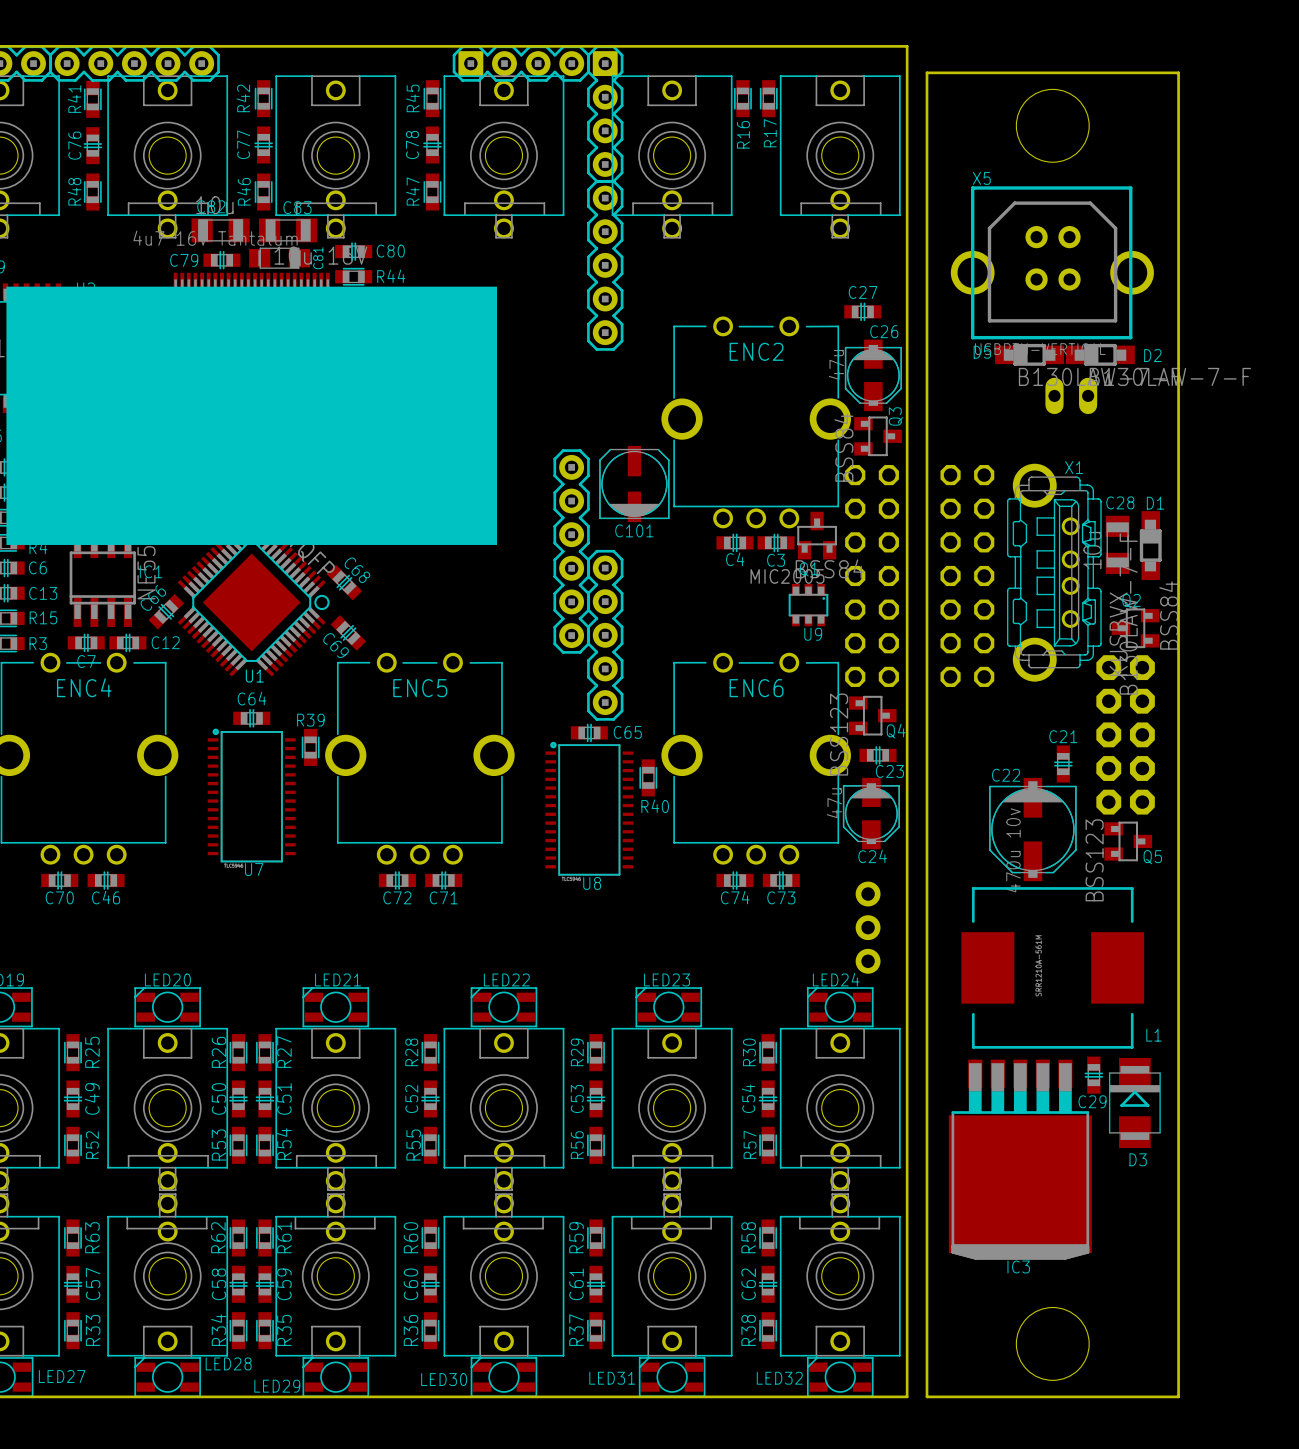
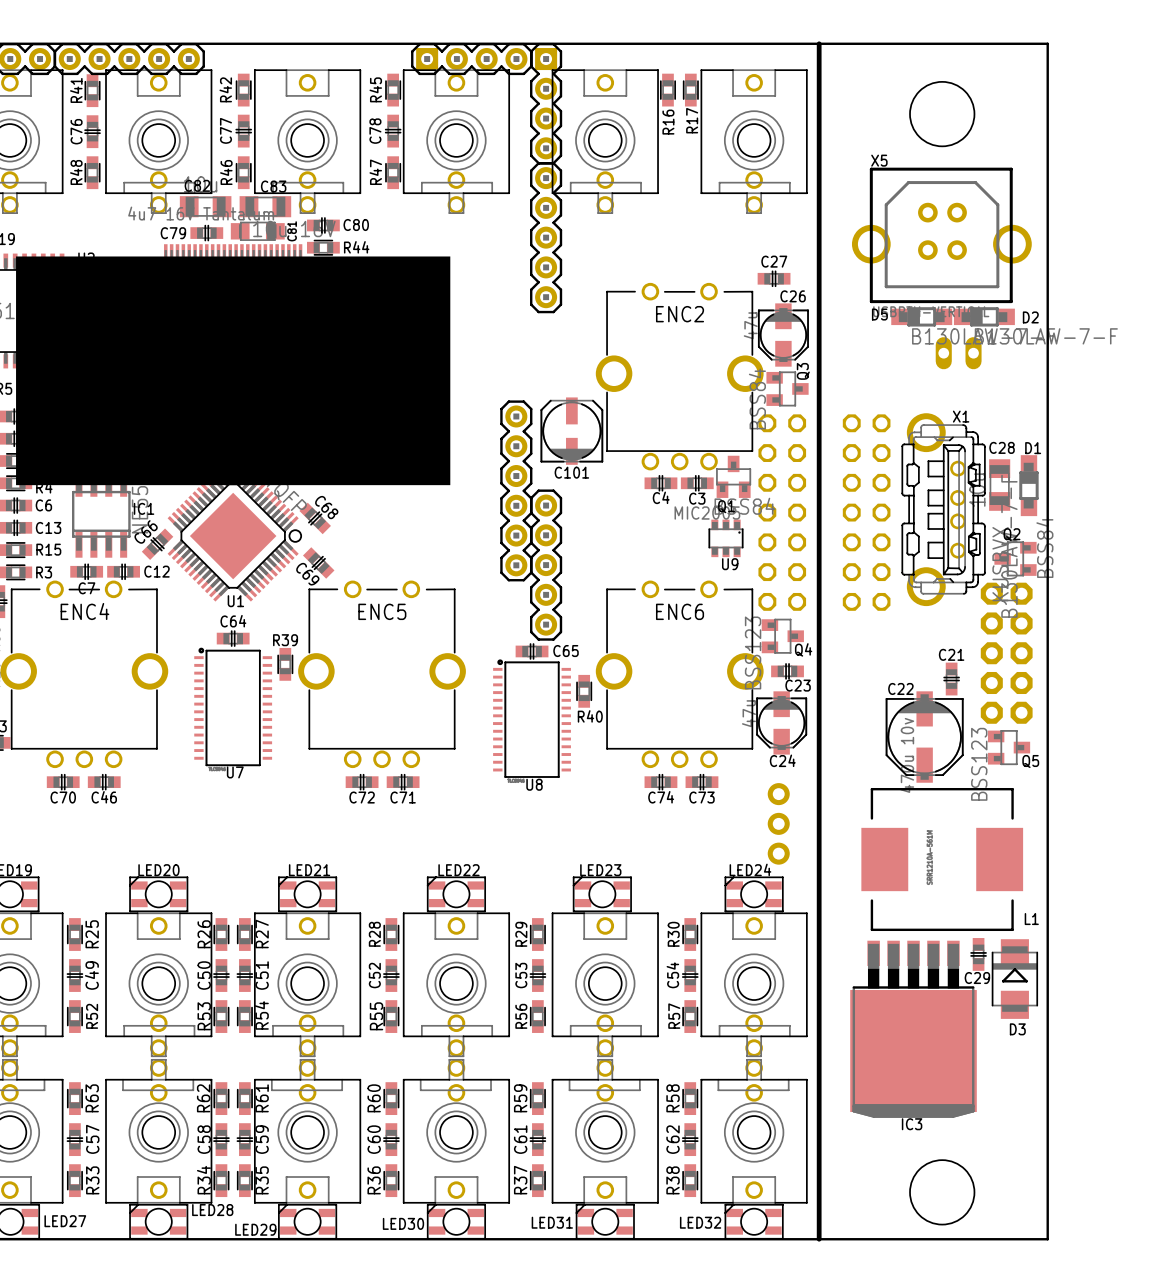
board edge: (907, 46) (907, 1396) -> (813, 43) (1047, 43) (1047, 1239)
line: none -> (819, 43) (819, 1239)
board edge: (926, 1396) (926, 72) (1178, 72) (1178, 1396) (1171, 1396) -> (830, 1239) (813, 1239)

